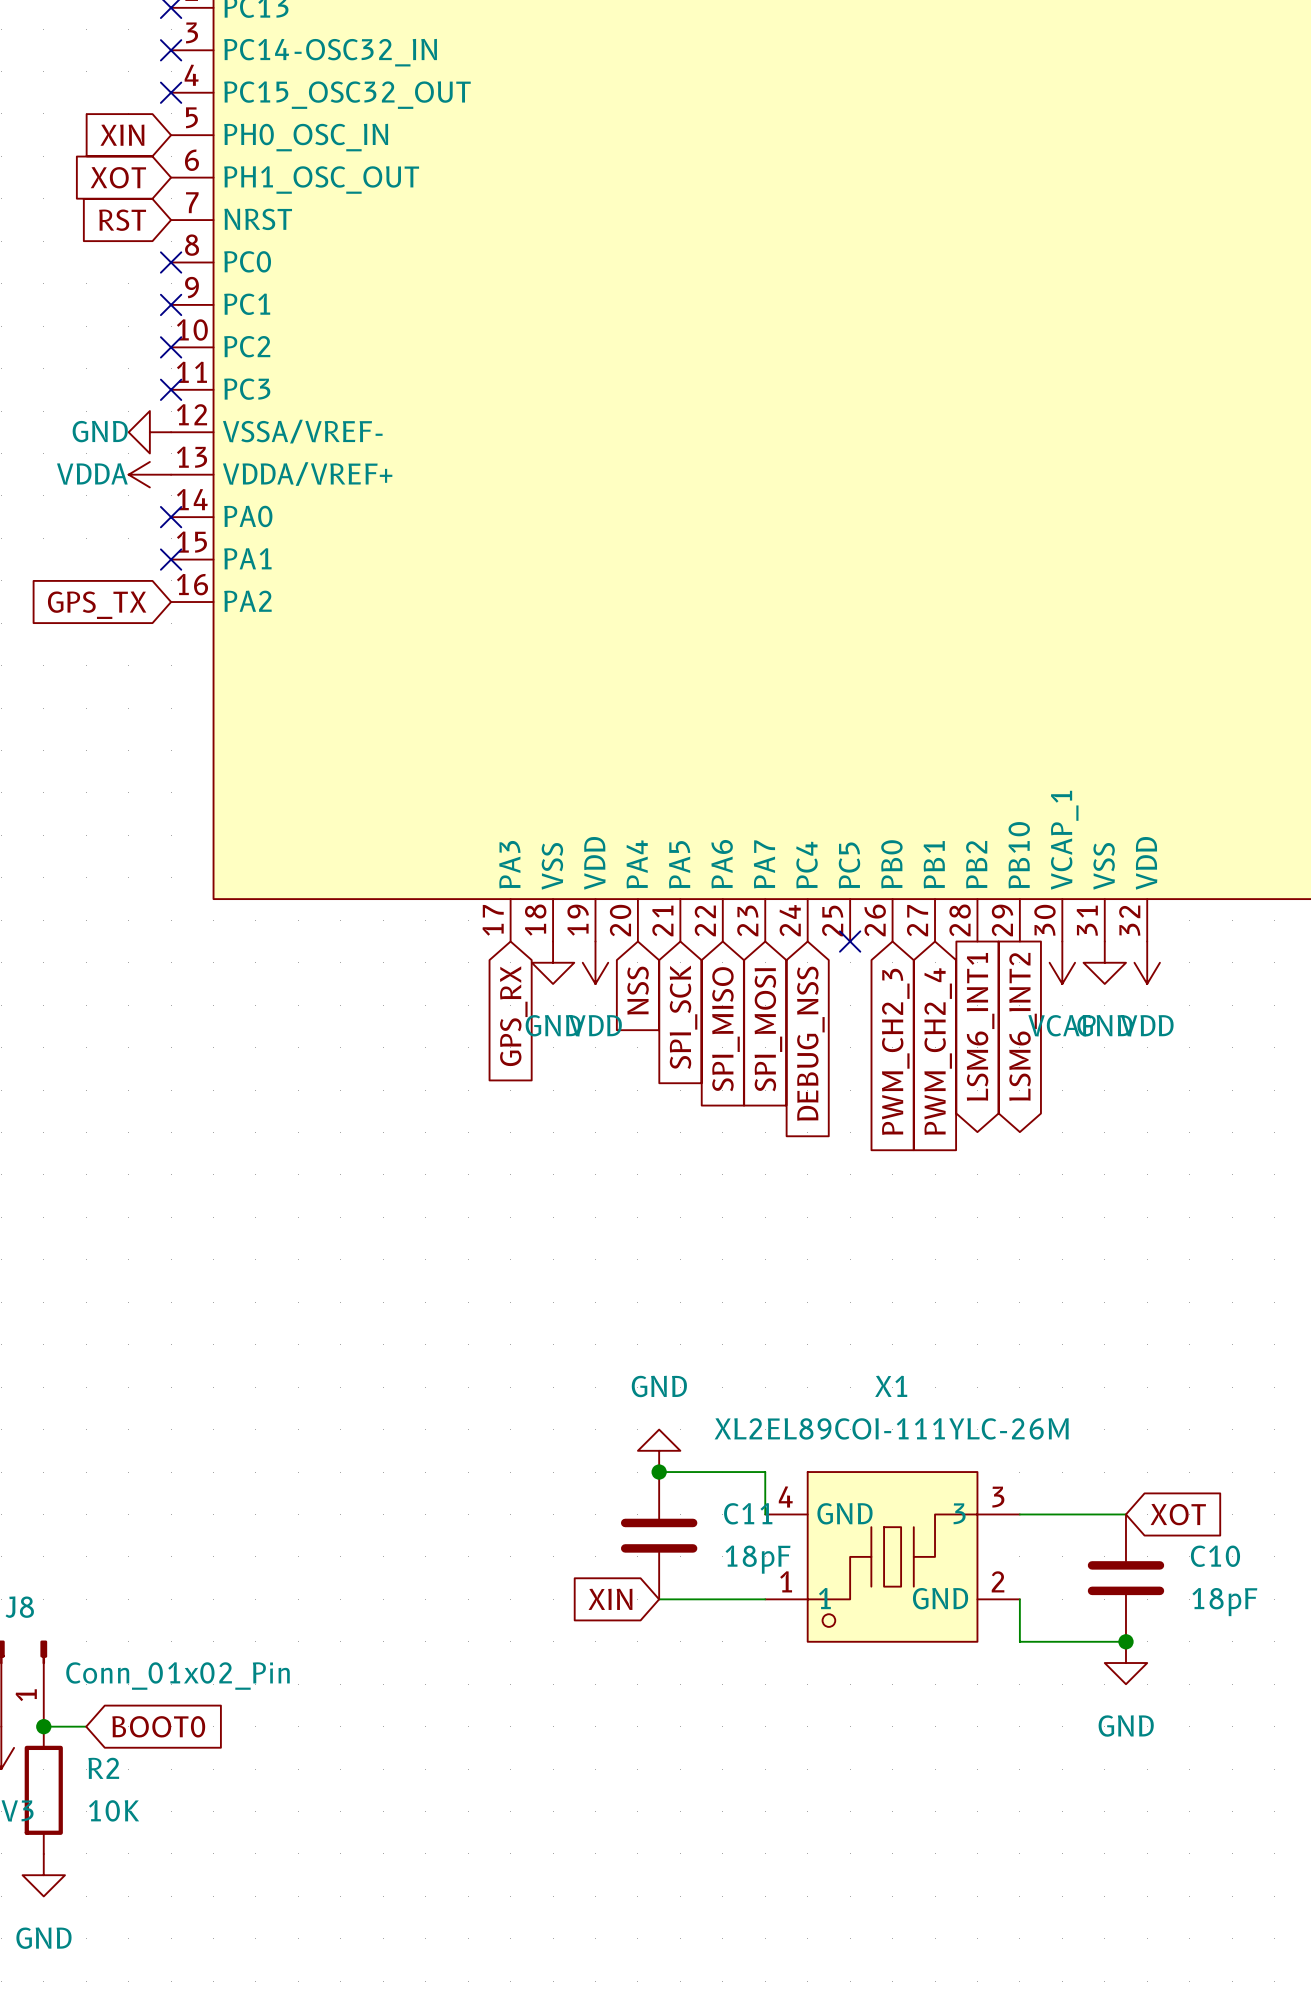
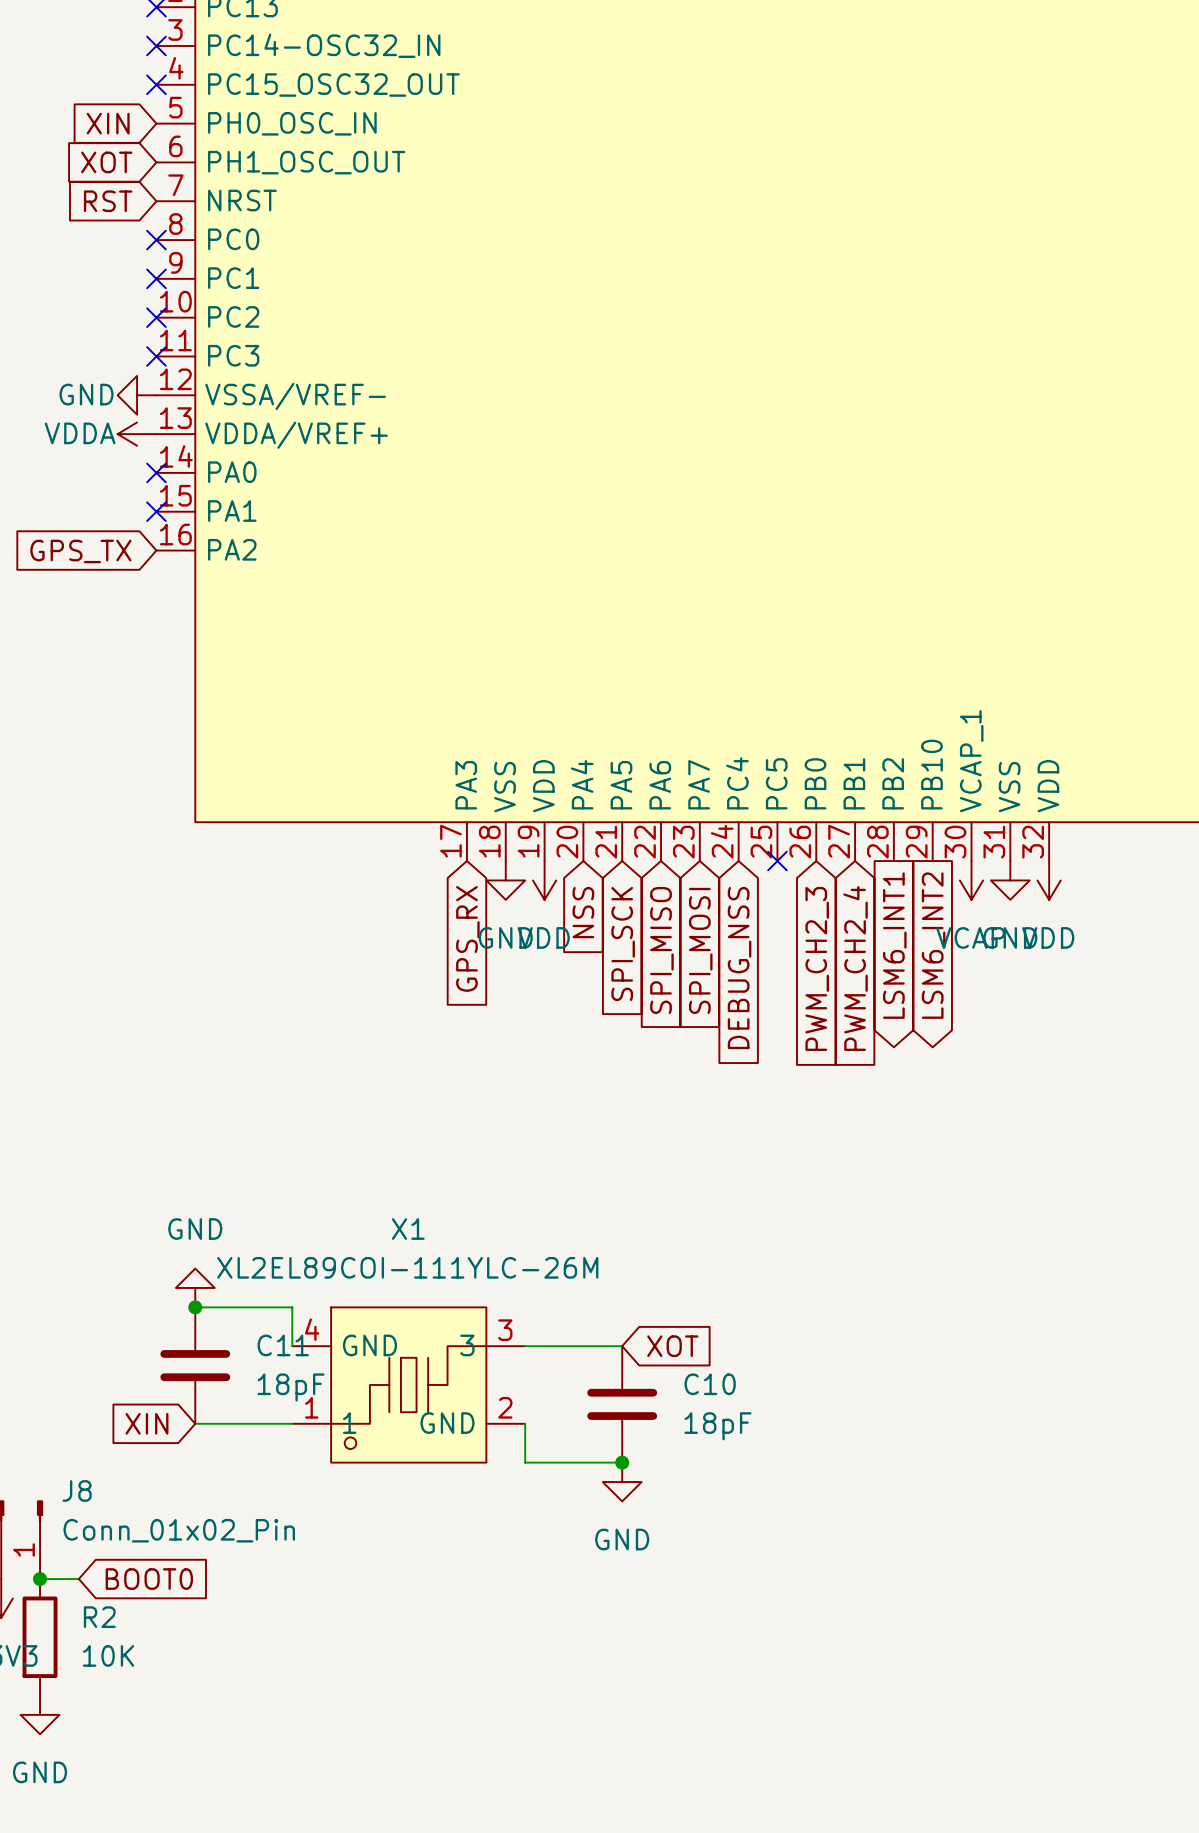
power symbol: none -> GND (195, 1287)
wire: none -> (195, 1307) (292, 1307) (292, 1346)
junction: none -> (195, 1307)
power symbol rotation: 0° (659, 1450) -> 180° (622, 1482)
power symbol position: GND (659, 1450) -> GND (622, 1482)
junction: (659, 1472) -> none
wire: (680, 1472) (765, 1472) (765, 1514) -> none
global label: none -> XOT (672, 1346)
wire: (1019, 1514) (1125, 1514) -> none
global label: XOT (1178, 1514) -> none
C11 position: (659, 1535) -> (195, 1365)
global label: none -> XIN (146, 1423)
wire: none -> (195, 1423) (292, 1423)
wire: none -> (525, 1423) (525, 1462) (602, 1462)
X1 position: (892, 1556) -> (408, 1384)
C10 position: (1125, 1578) -> (622, 1404)
global label: XIN (610, 1599) -> none
wire: (680, 1599) (765, 1599) -> (525, 1346) (602, 1346)
junction: none -> (622, 1462)
wire: (1019, 1599) (1019, 1641) (1125, 1641) -> none
J8 name position: J8 (19, 1607) -> J8 (77, 1491)
junction: (1125, 1641) -> none
power symbol: GND (1125, 1663) -> none

